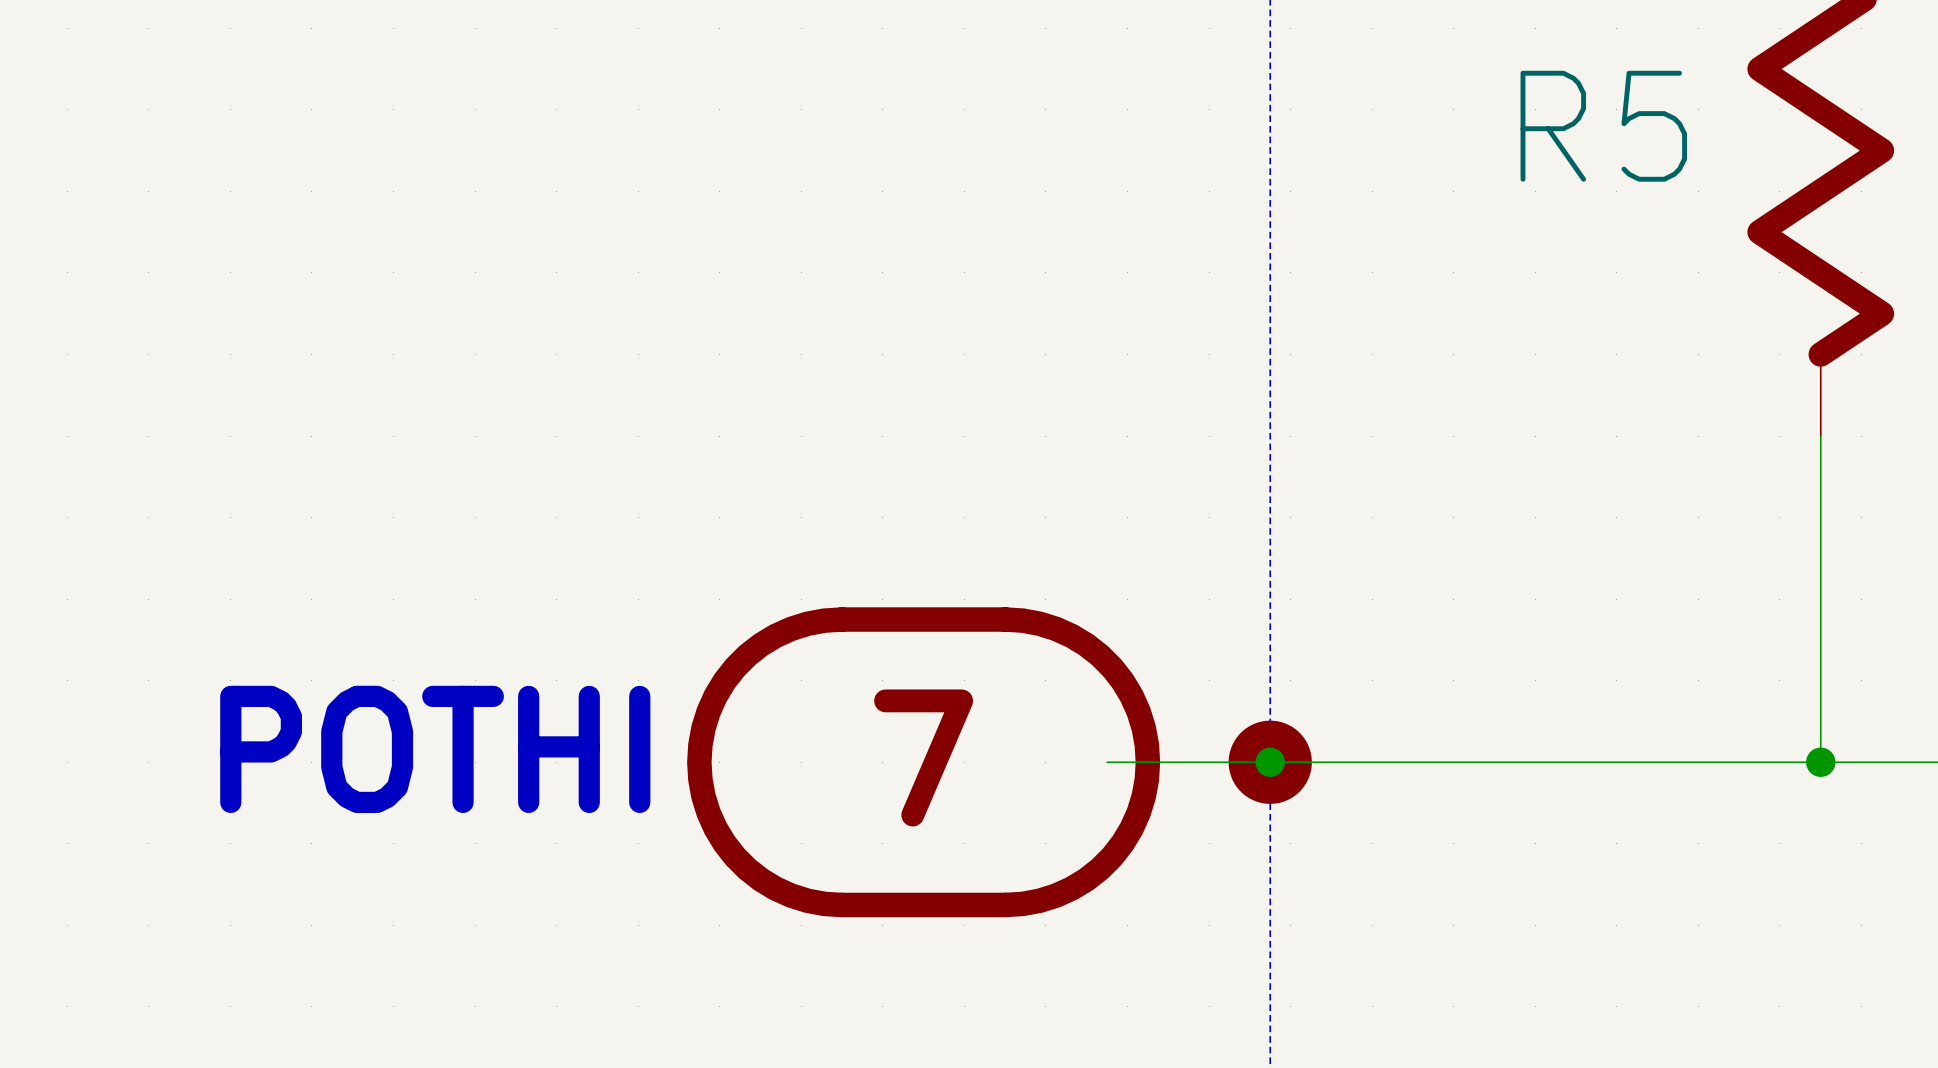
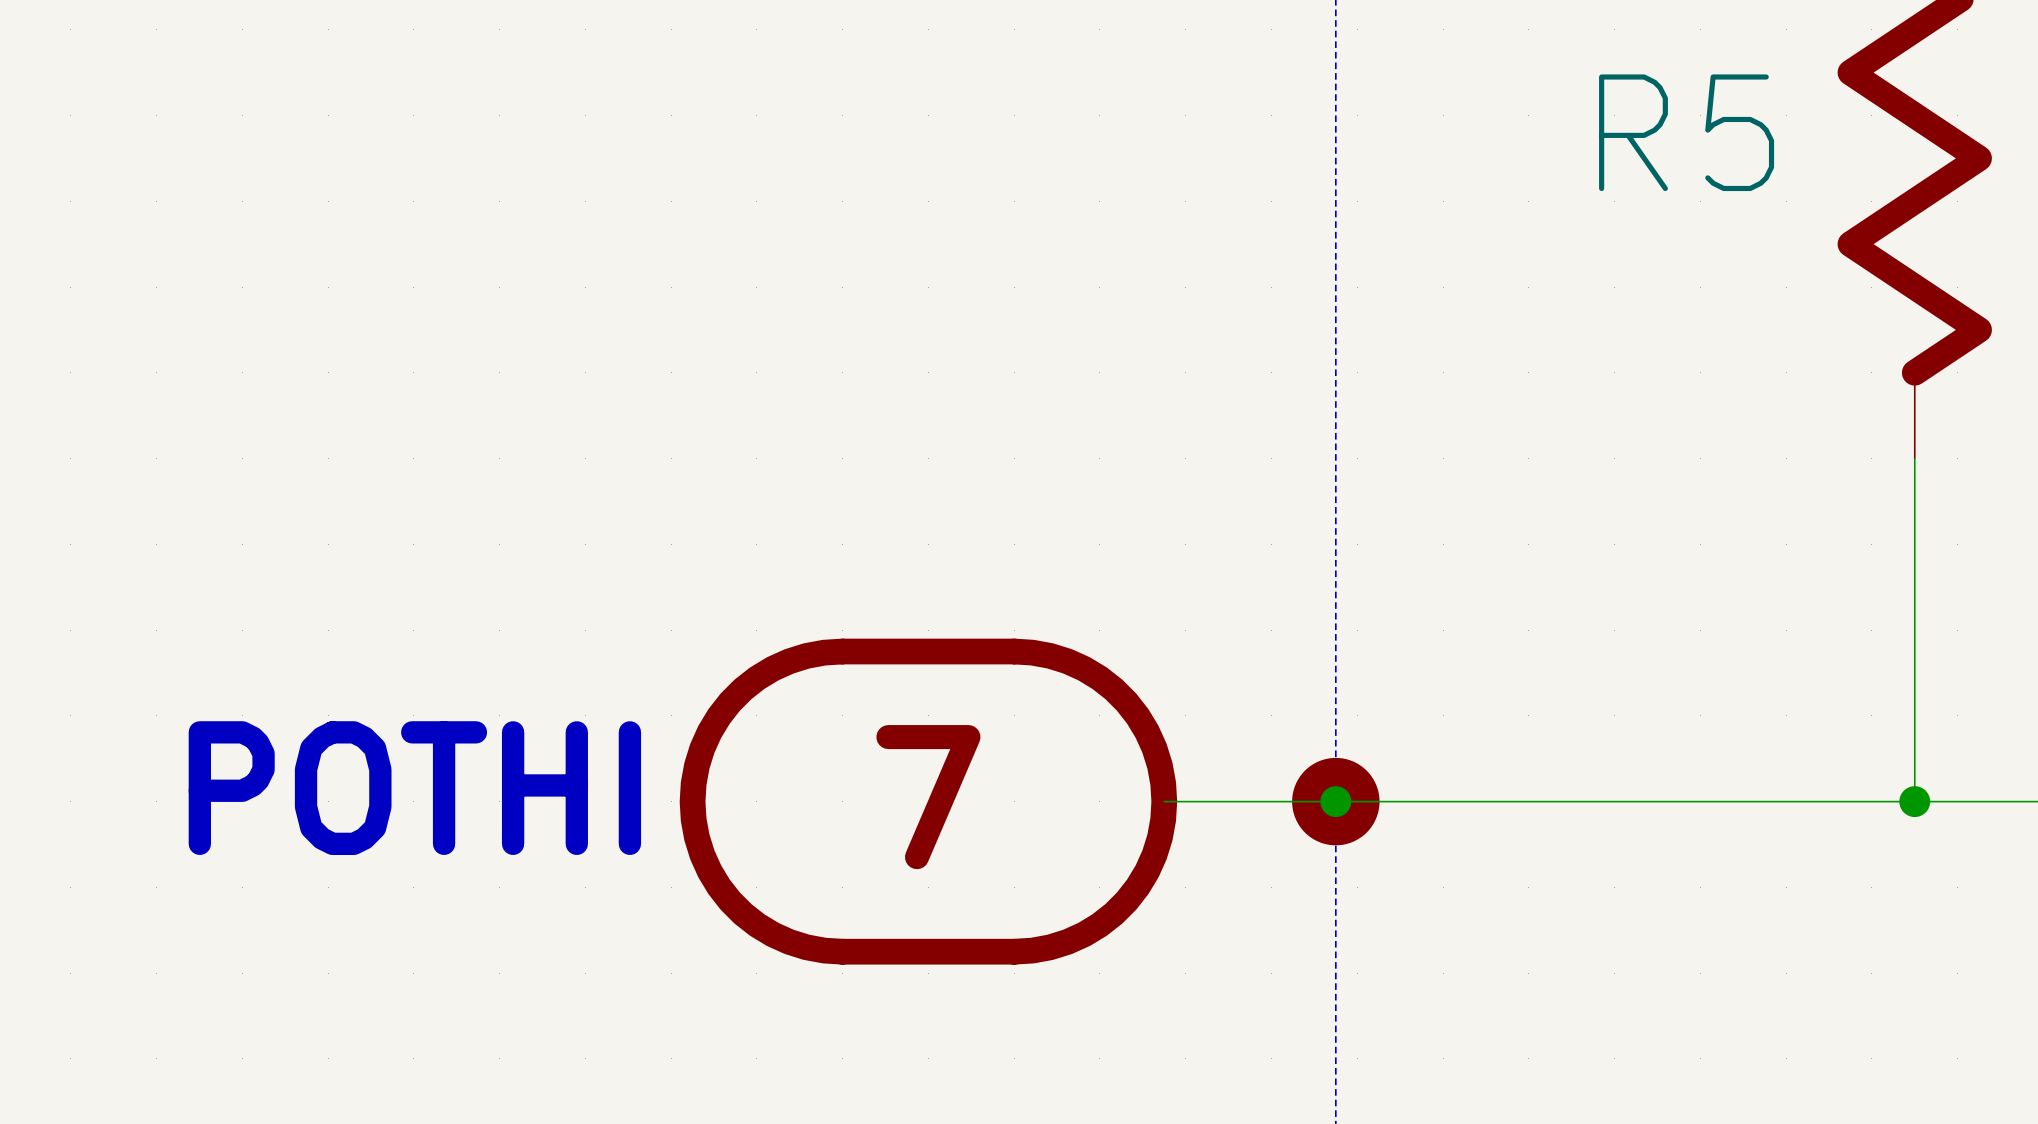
text position: POTHI (435, 749) -> POTHI (414, 788)
part position: (923, 762) -> (928, 801)

